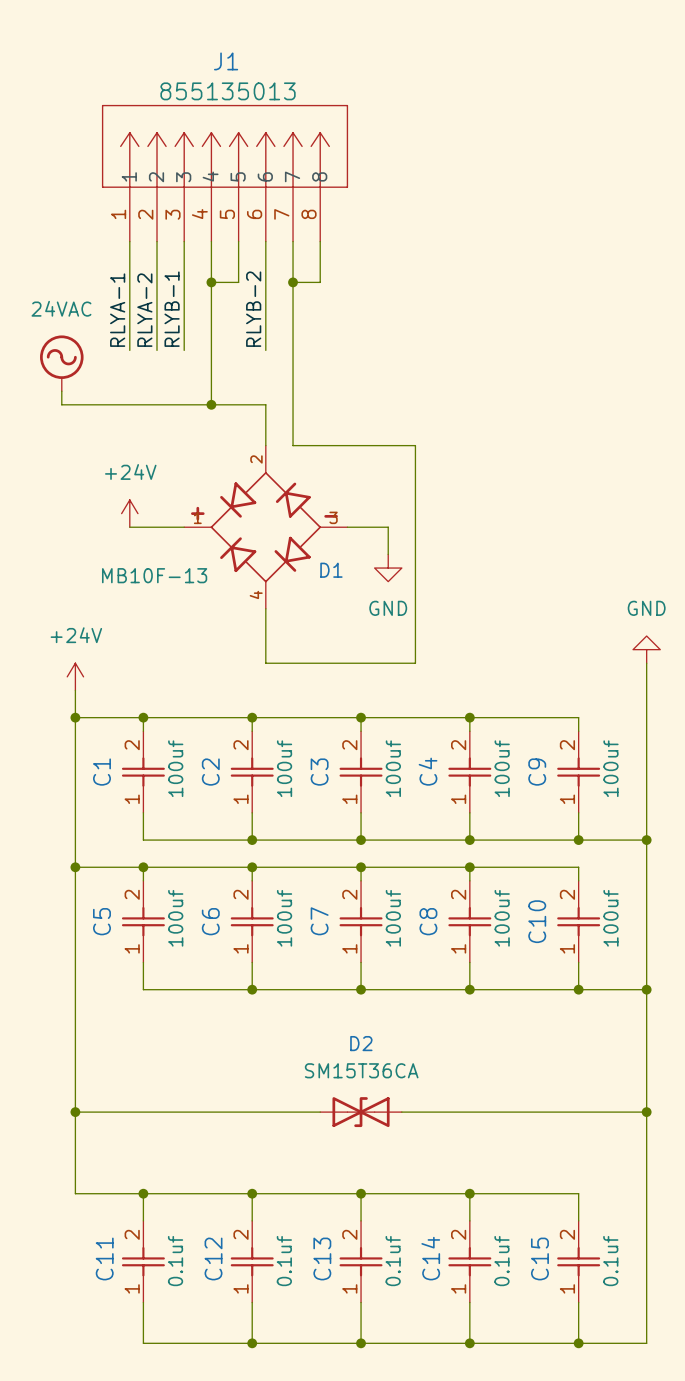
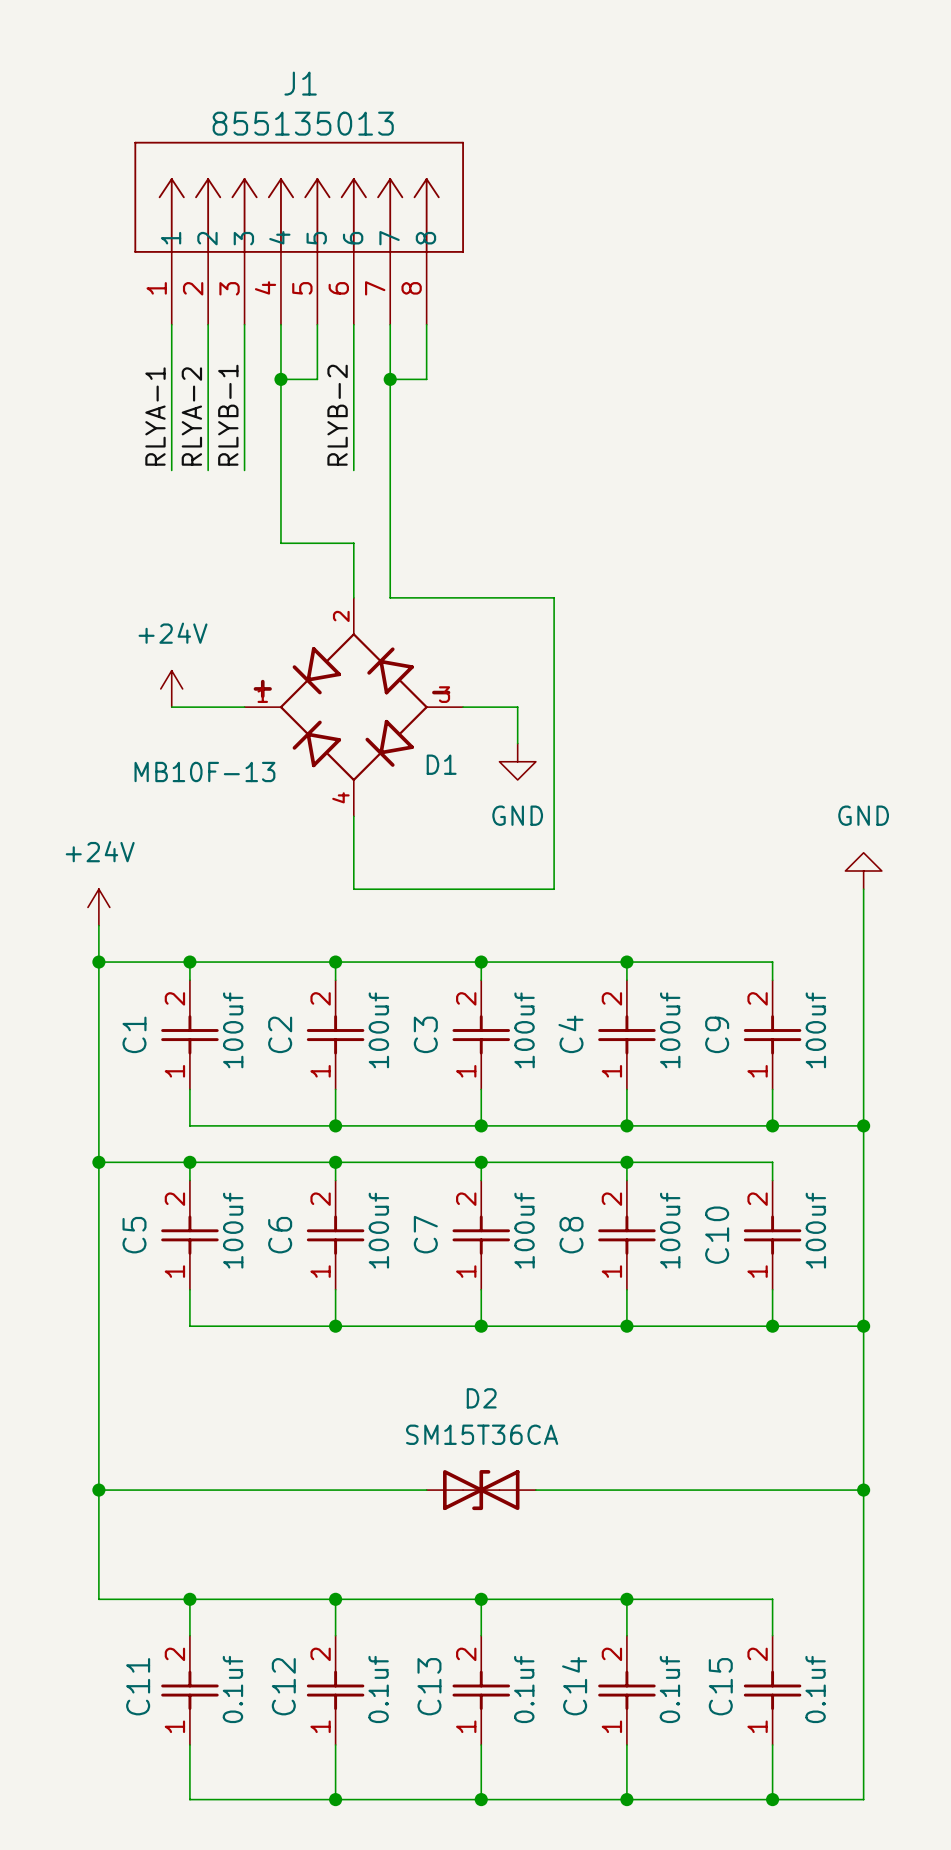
power symbol: 24VAC (61, 363) -> none
wire: (61, 391) (61, 404) (211, 404) -> none
junction: (211, 404) -> none

